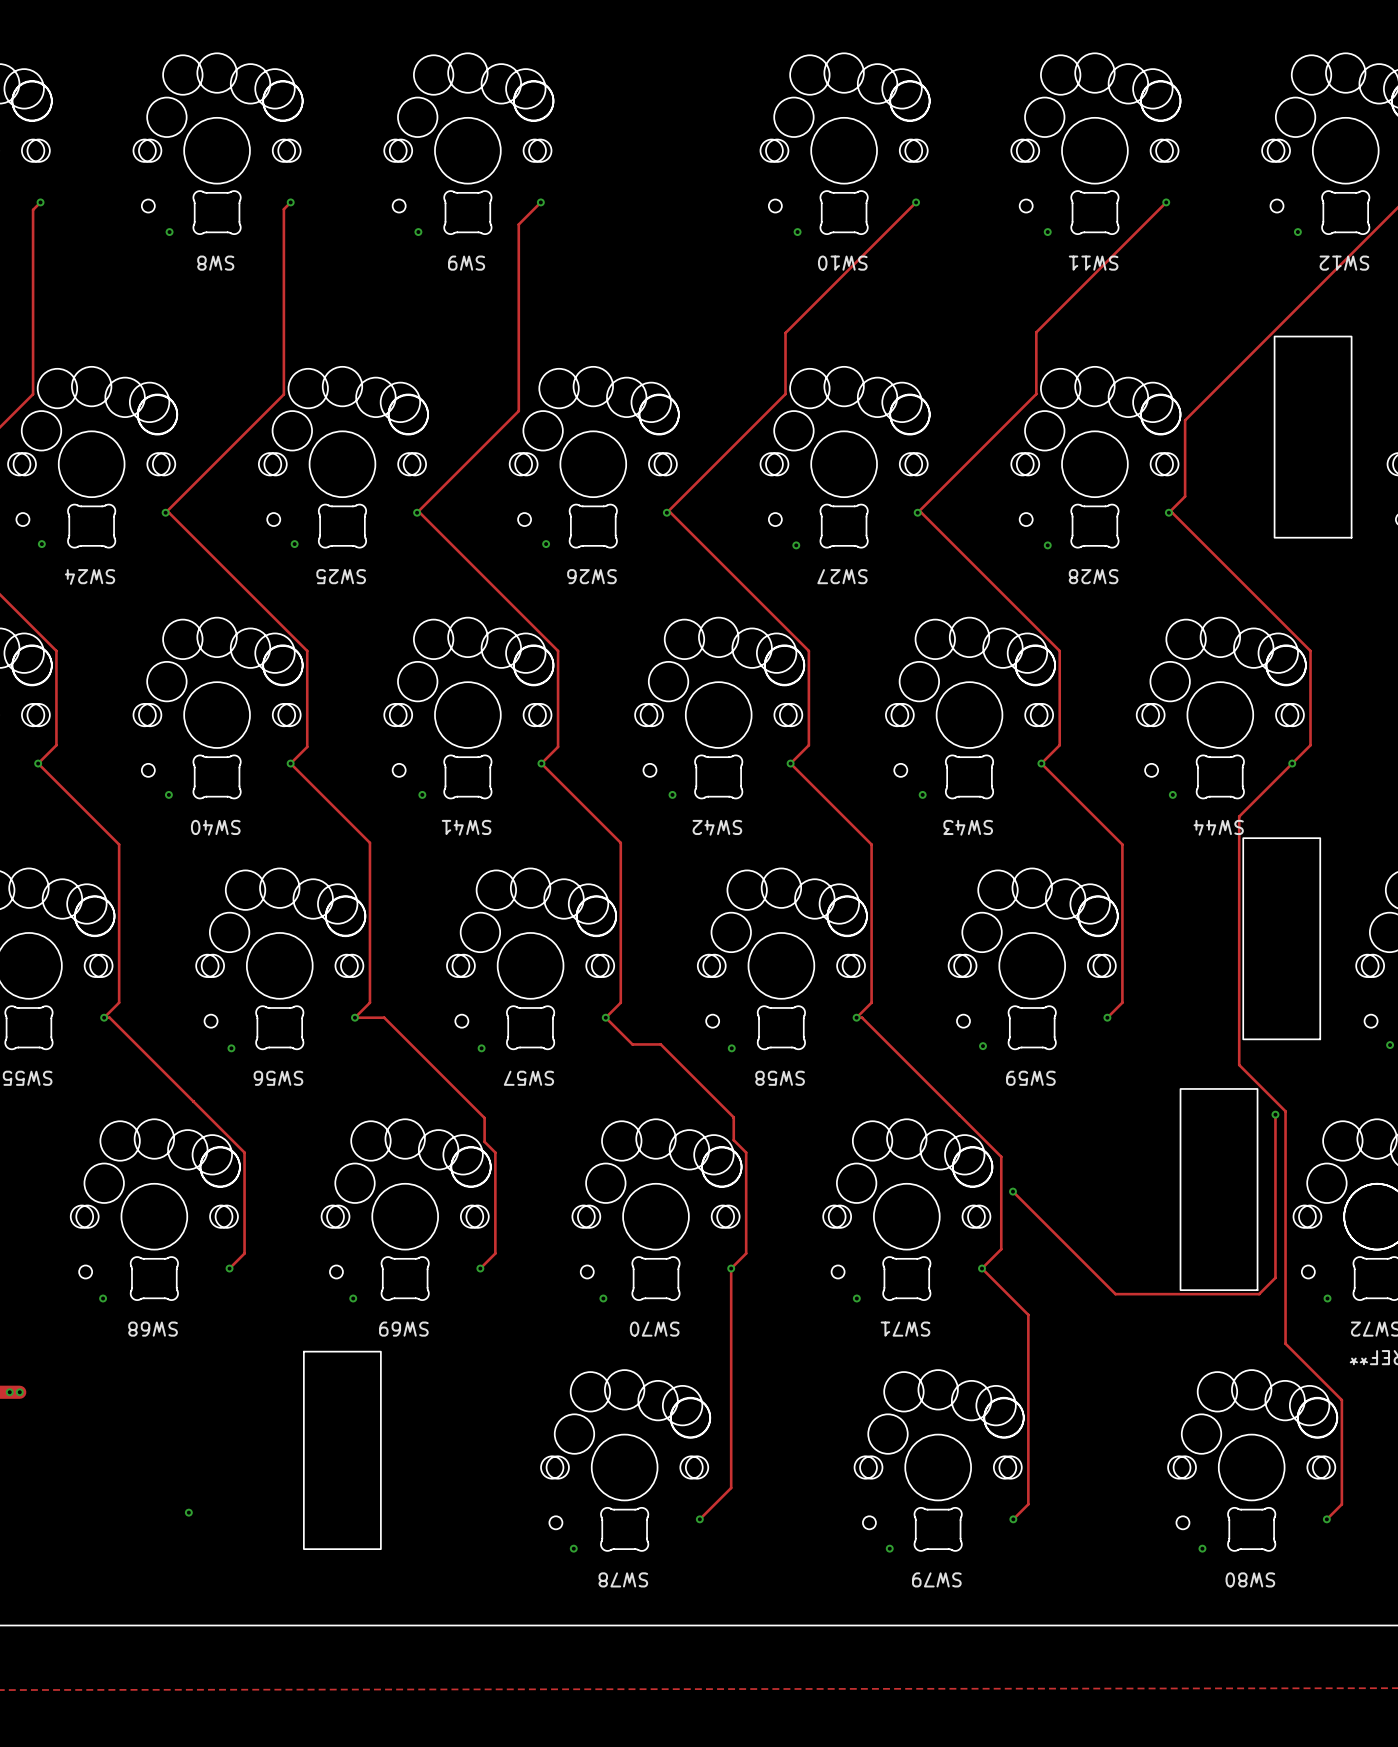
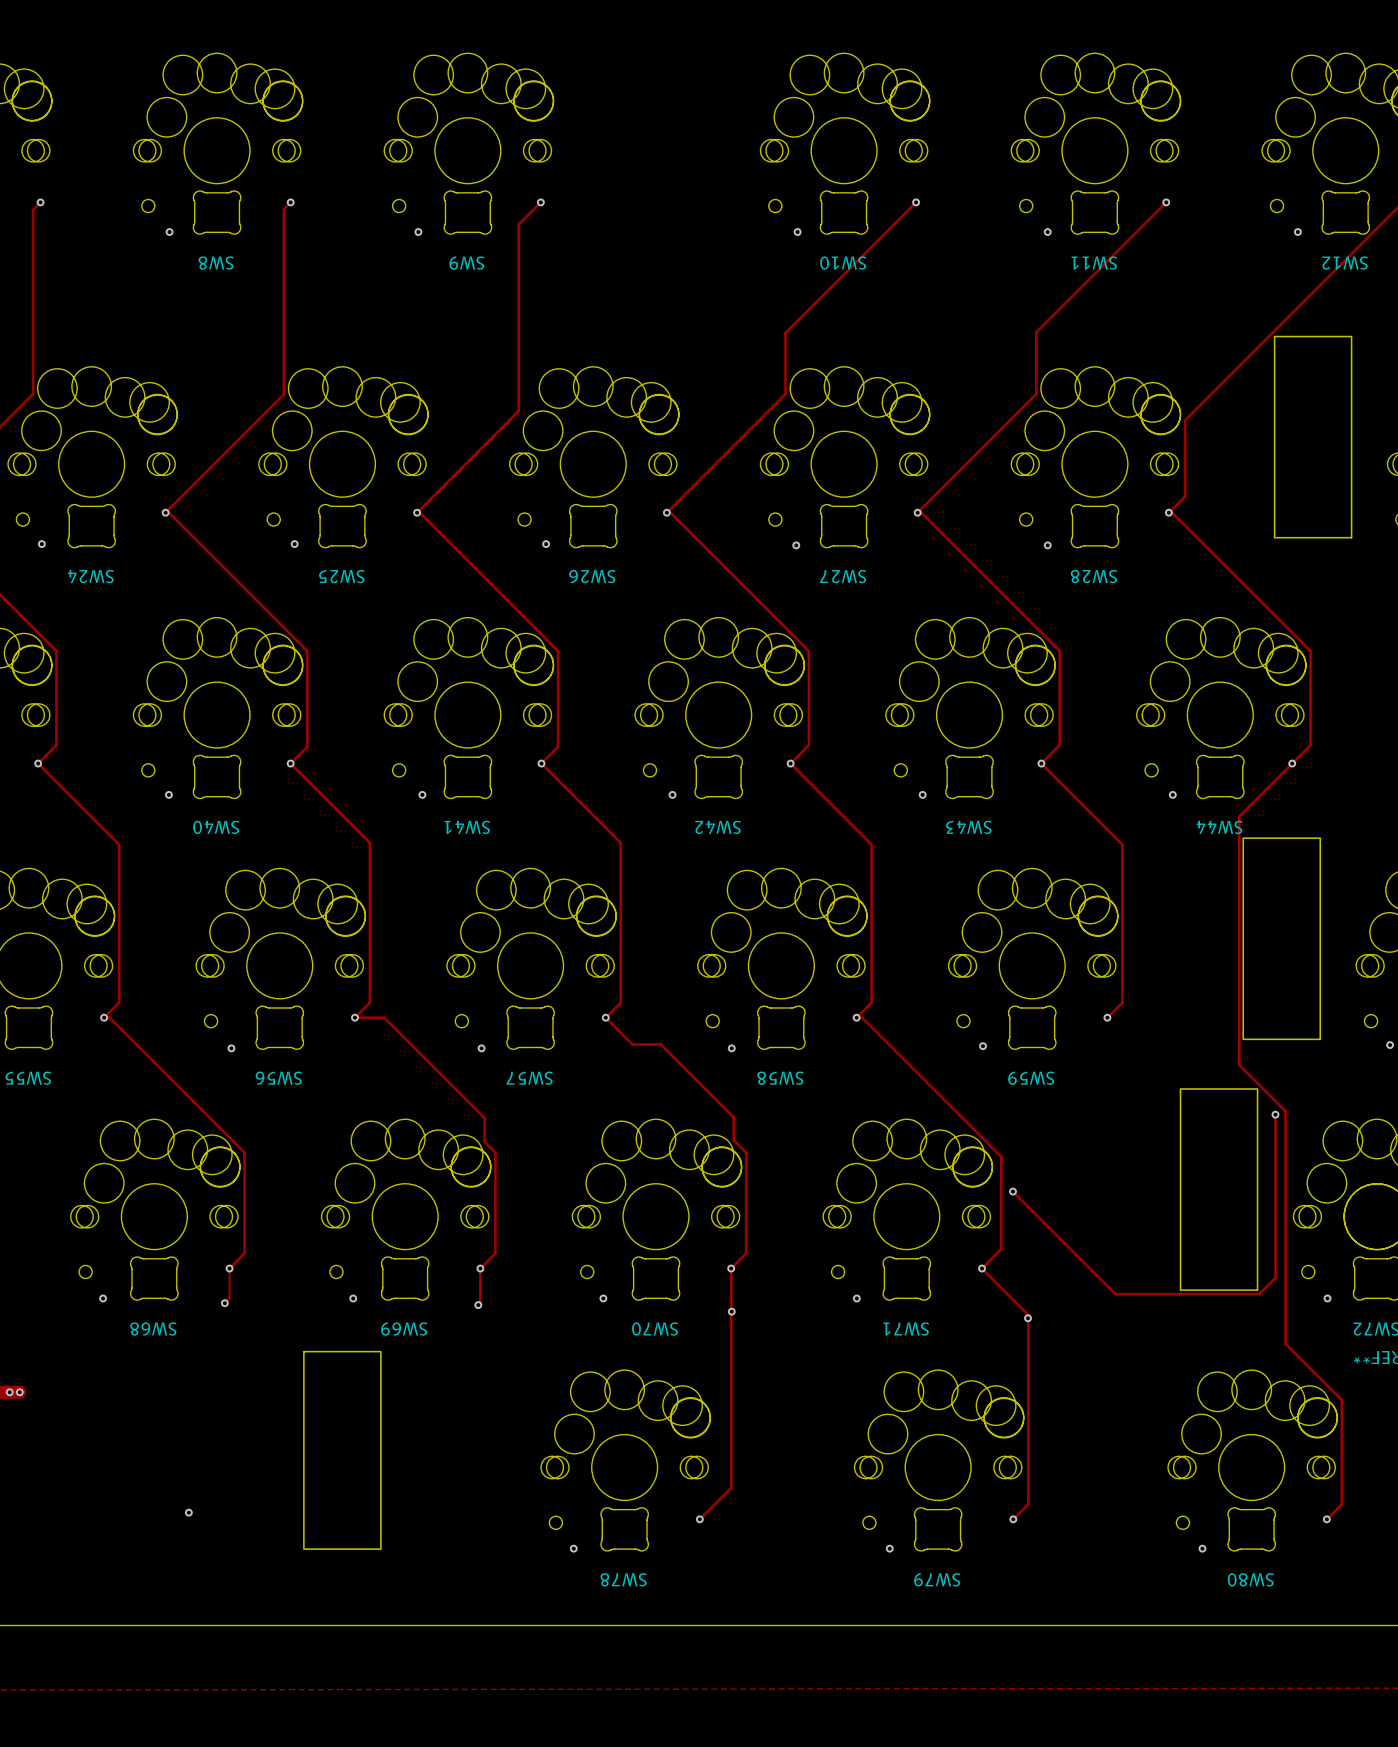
track: none -> (229, 1268) (229, 1298) (224, 1303)
track: none -> (480, 1268) (480, 1303) (478, 1305)
via: none -> (224, 1303)
via: none -> (478, 1305)
via: none -> (731, 1311)
via: none -> (1027, 1318)

